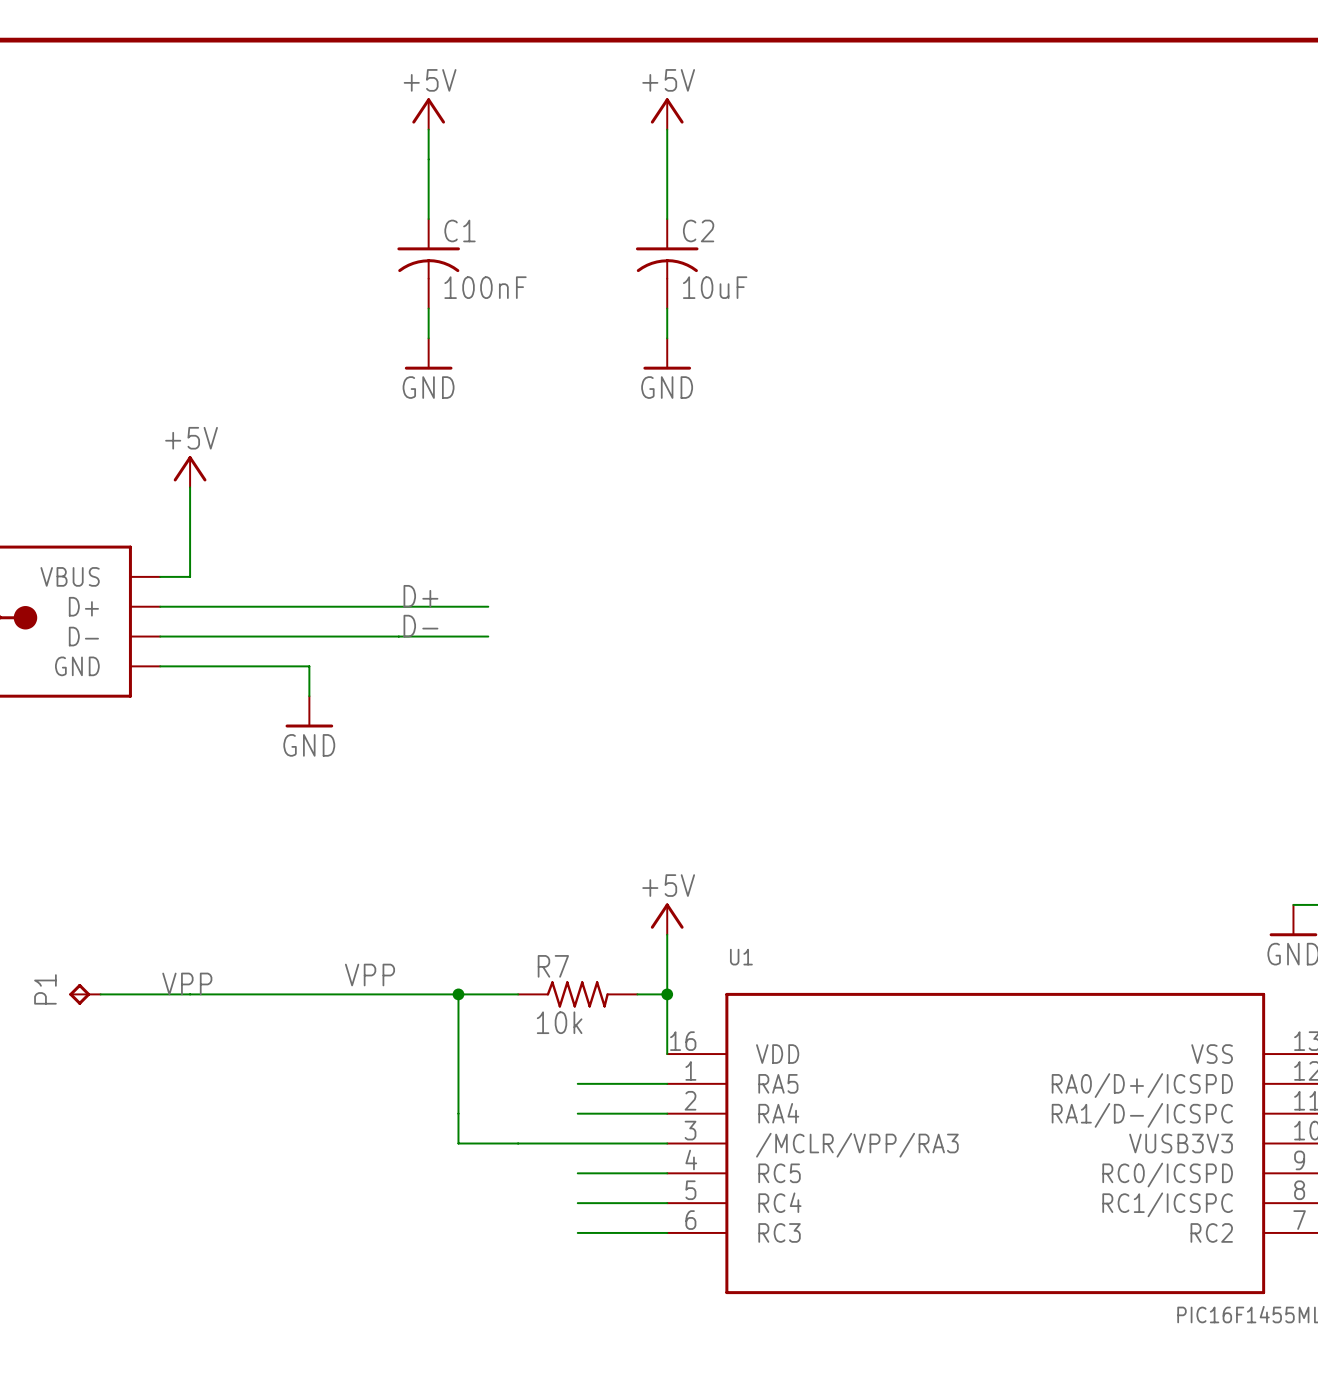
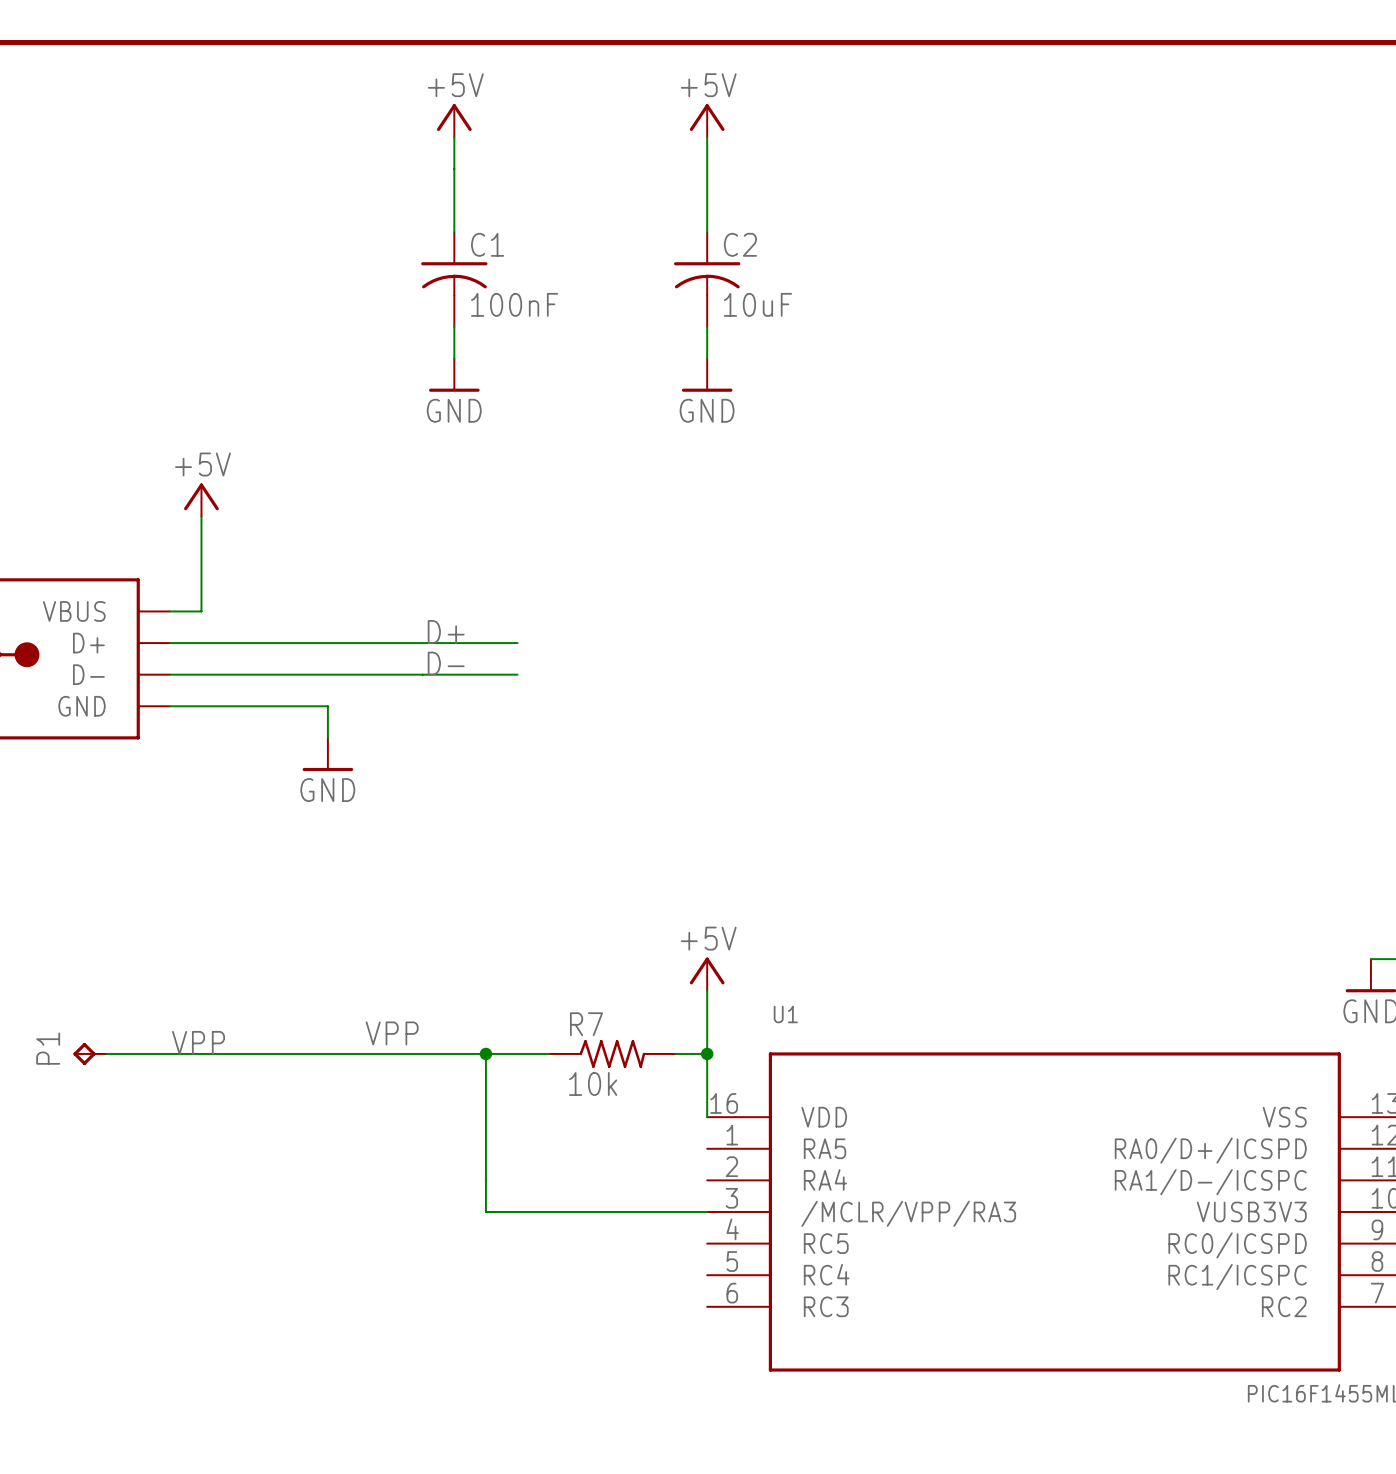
wire: (577, 1083) (667, 1083) -> none
wire: (577, 1113) (667, 1113) -> none
wire: (577, 1173) (667, 1173) -> none
wire: (577, 1203) (667, 1203) -> none
wire: (577, 1232) (667, 1232) -> none

